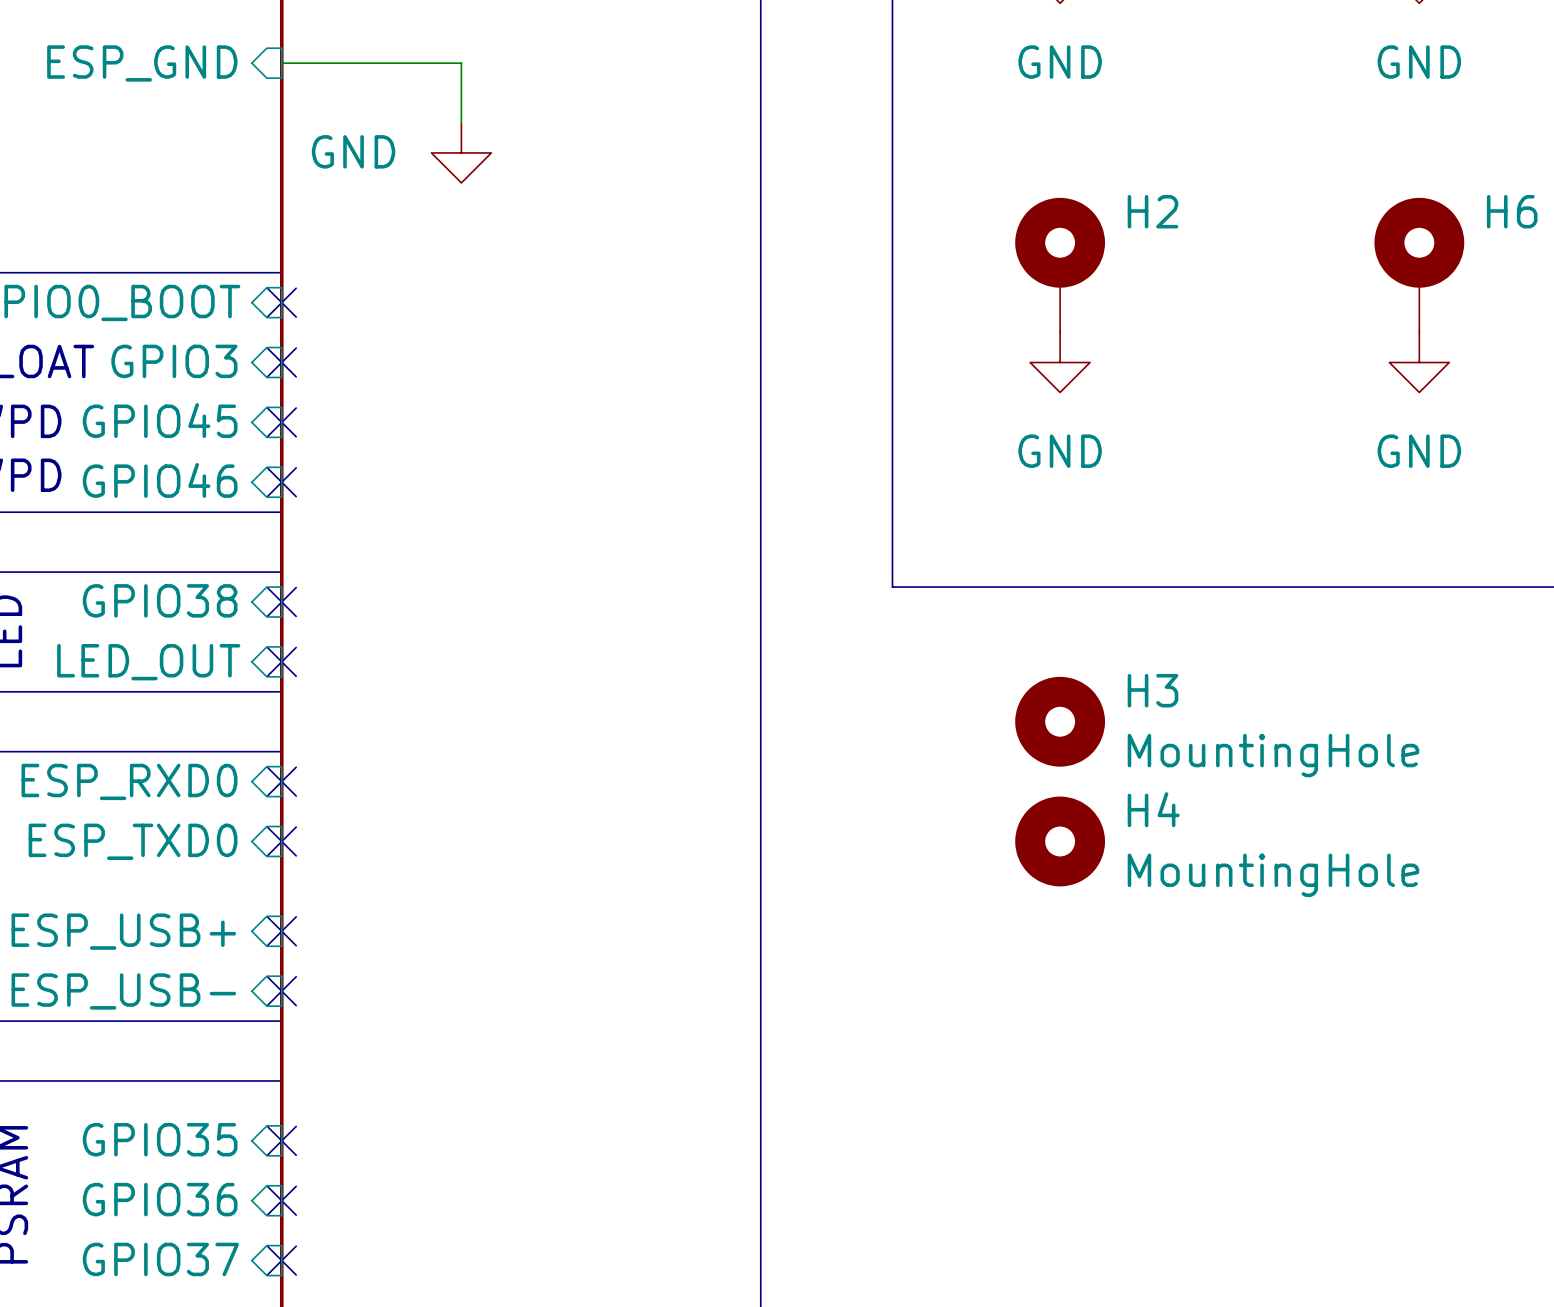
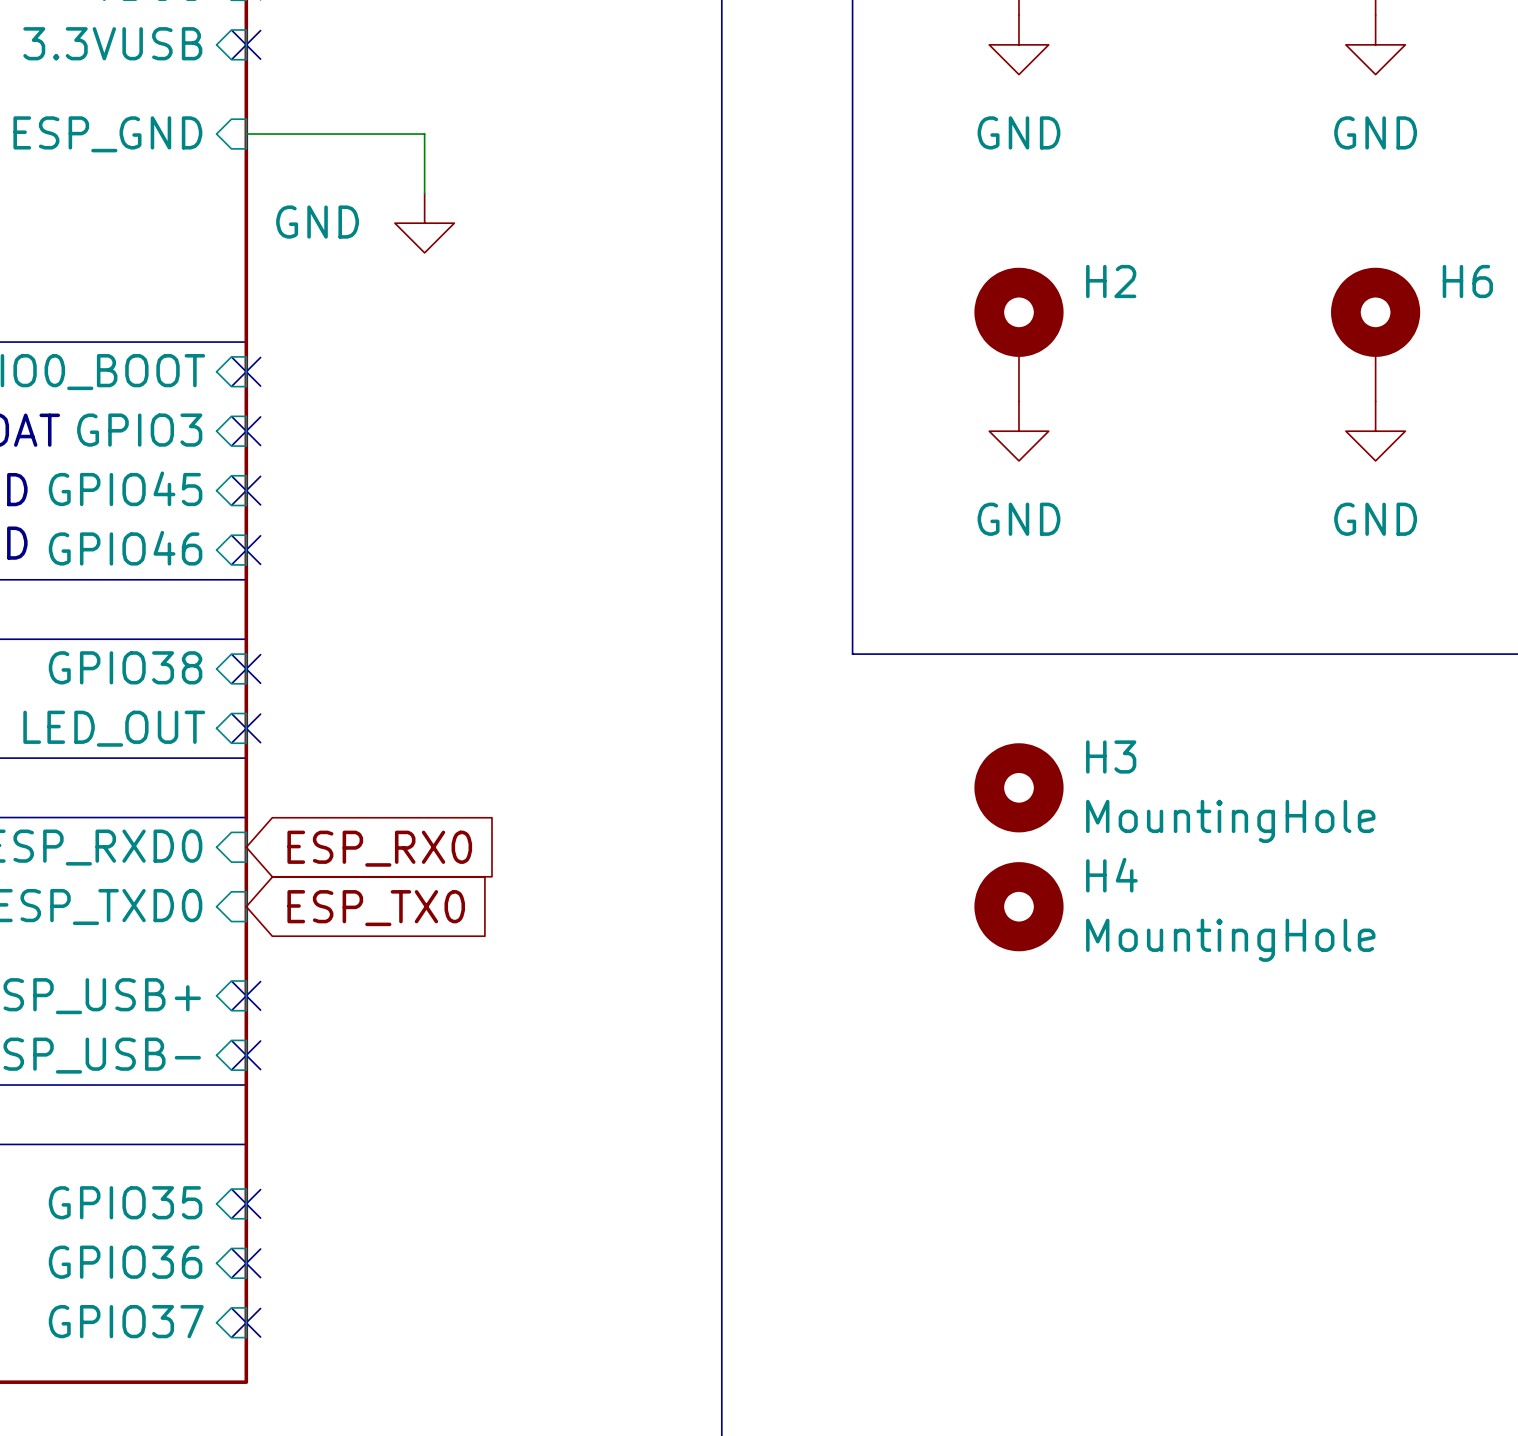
no-connect mark: (281, 781) -> none
global label: none -> ESP_RX0 (379, 848)
no-connect mark: (281, 841) -> none
global label: none -> ESP_TX0 (376, 908)

